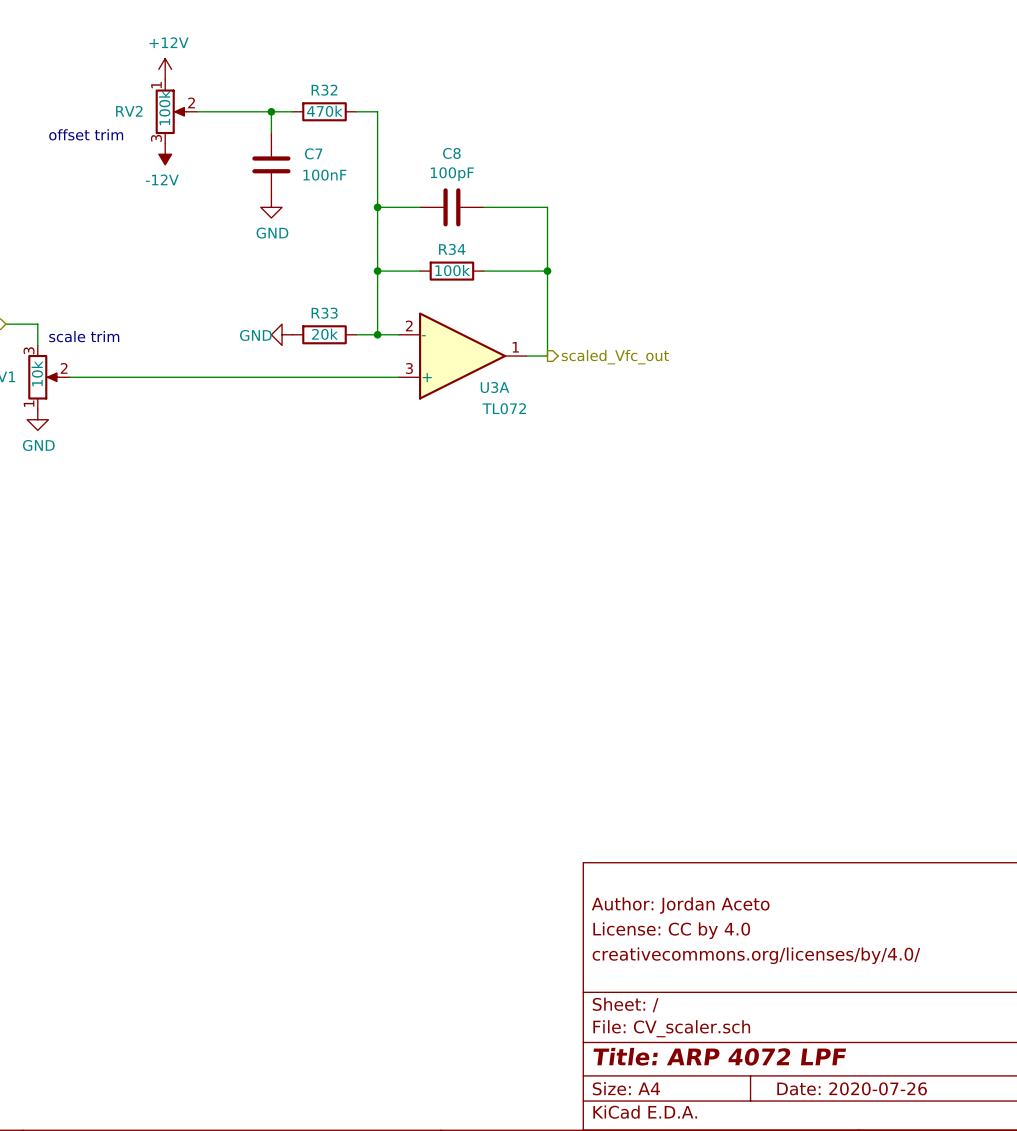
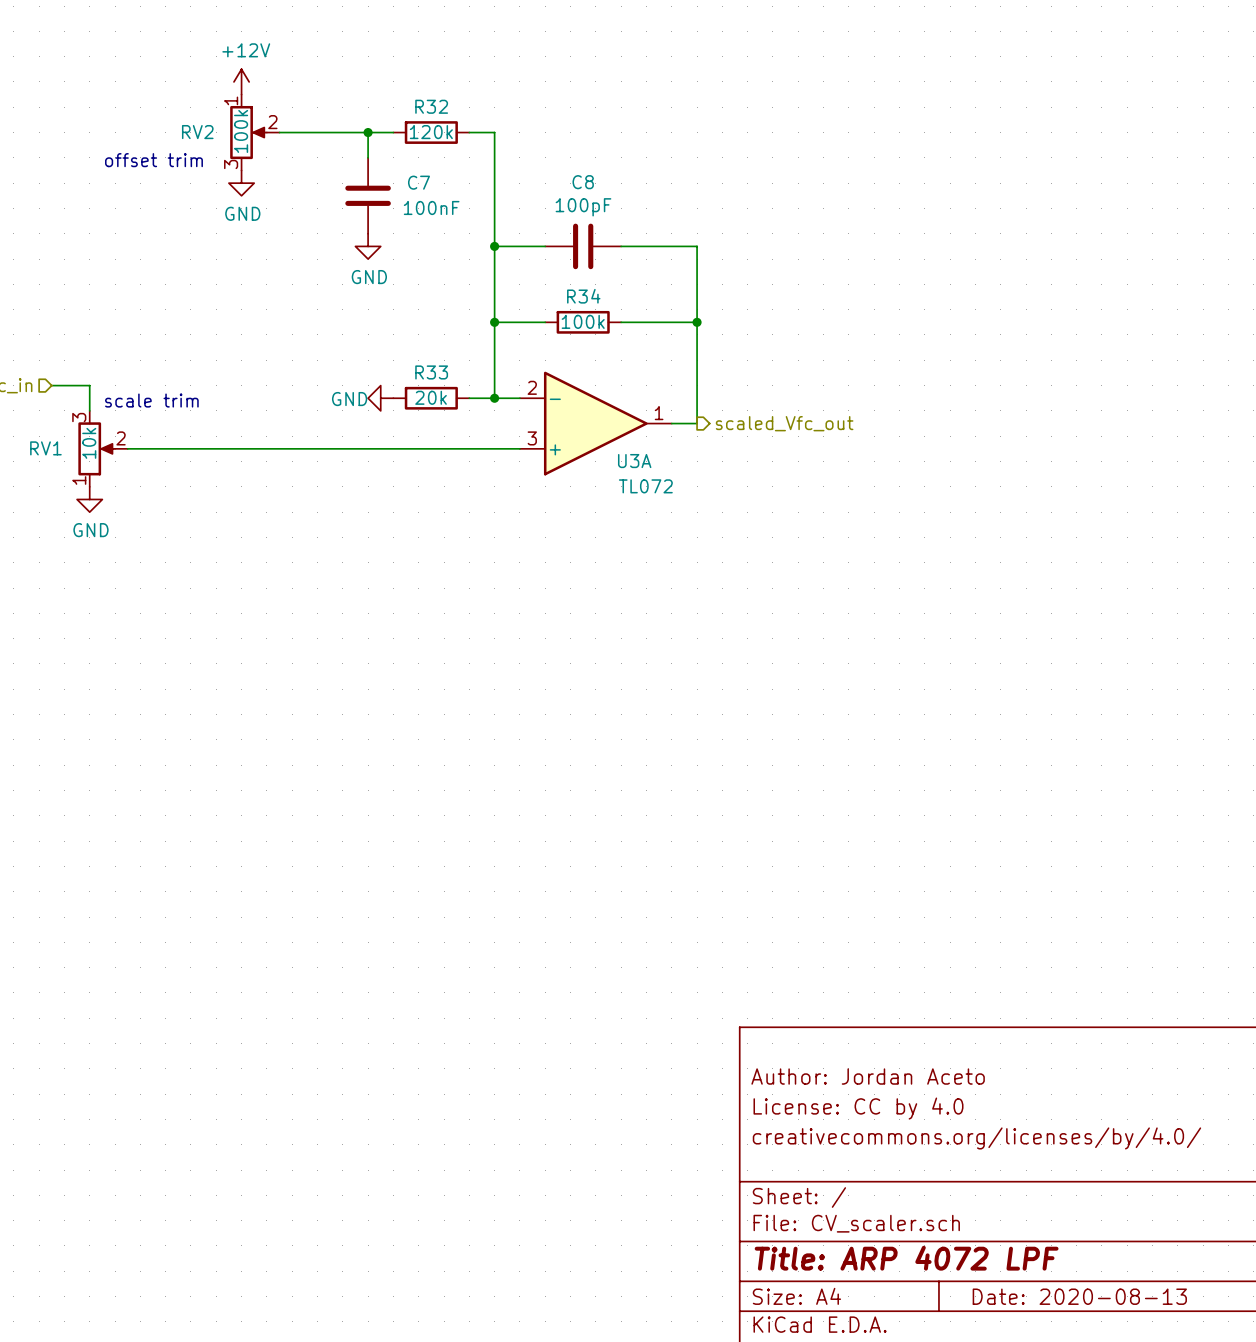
R32 value: 470k (324, 111) -> 120k (431, 132)
power symbol: -12V (165, 154) -> GND (241, 183)
title block: Date: 2020-07-26 (852, 1088) -> Date: 2020-08-13 (1079, 1296)

